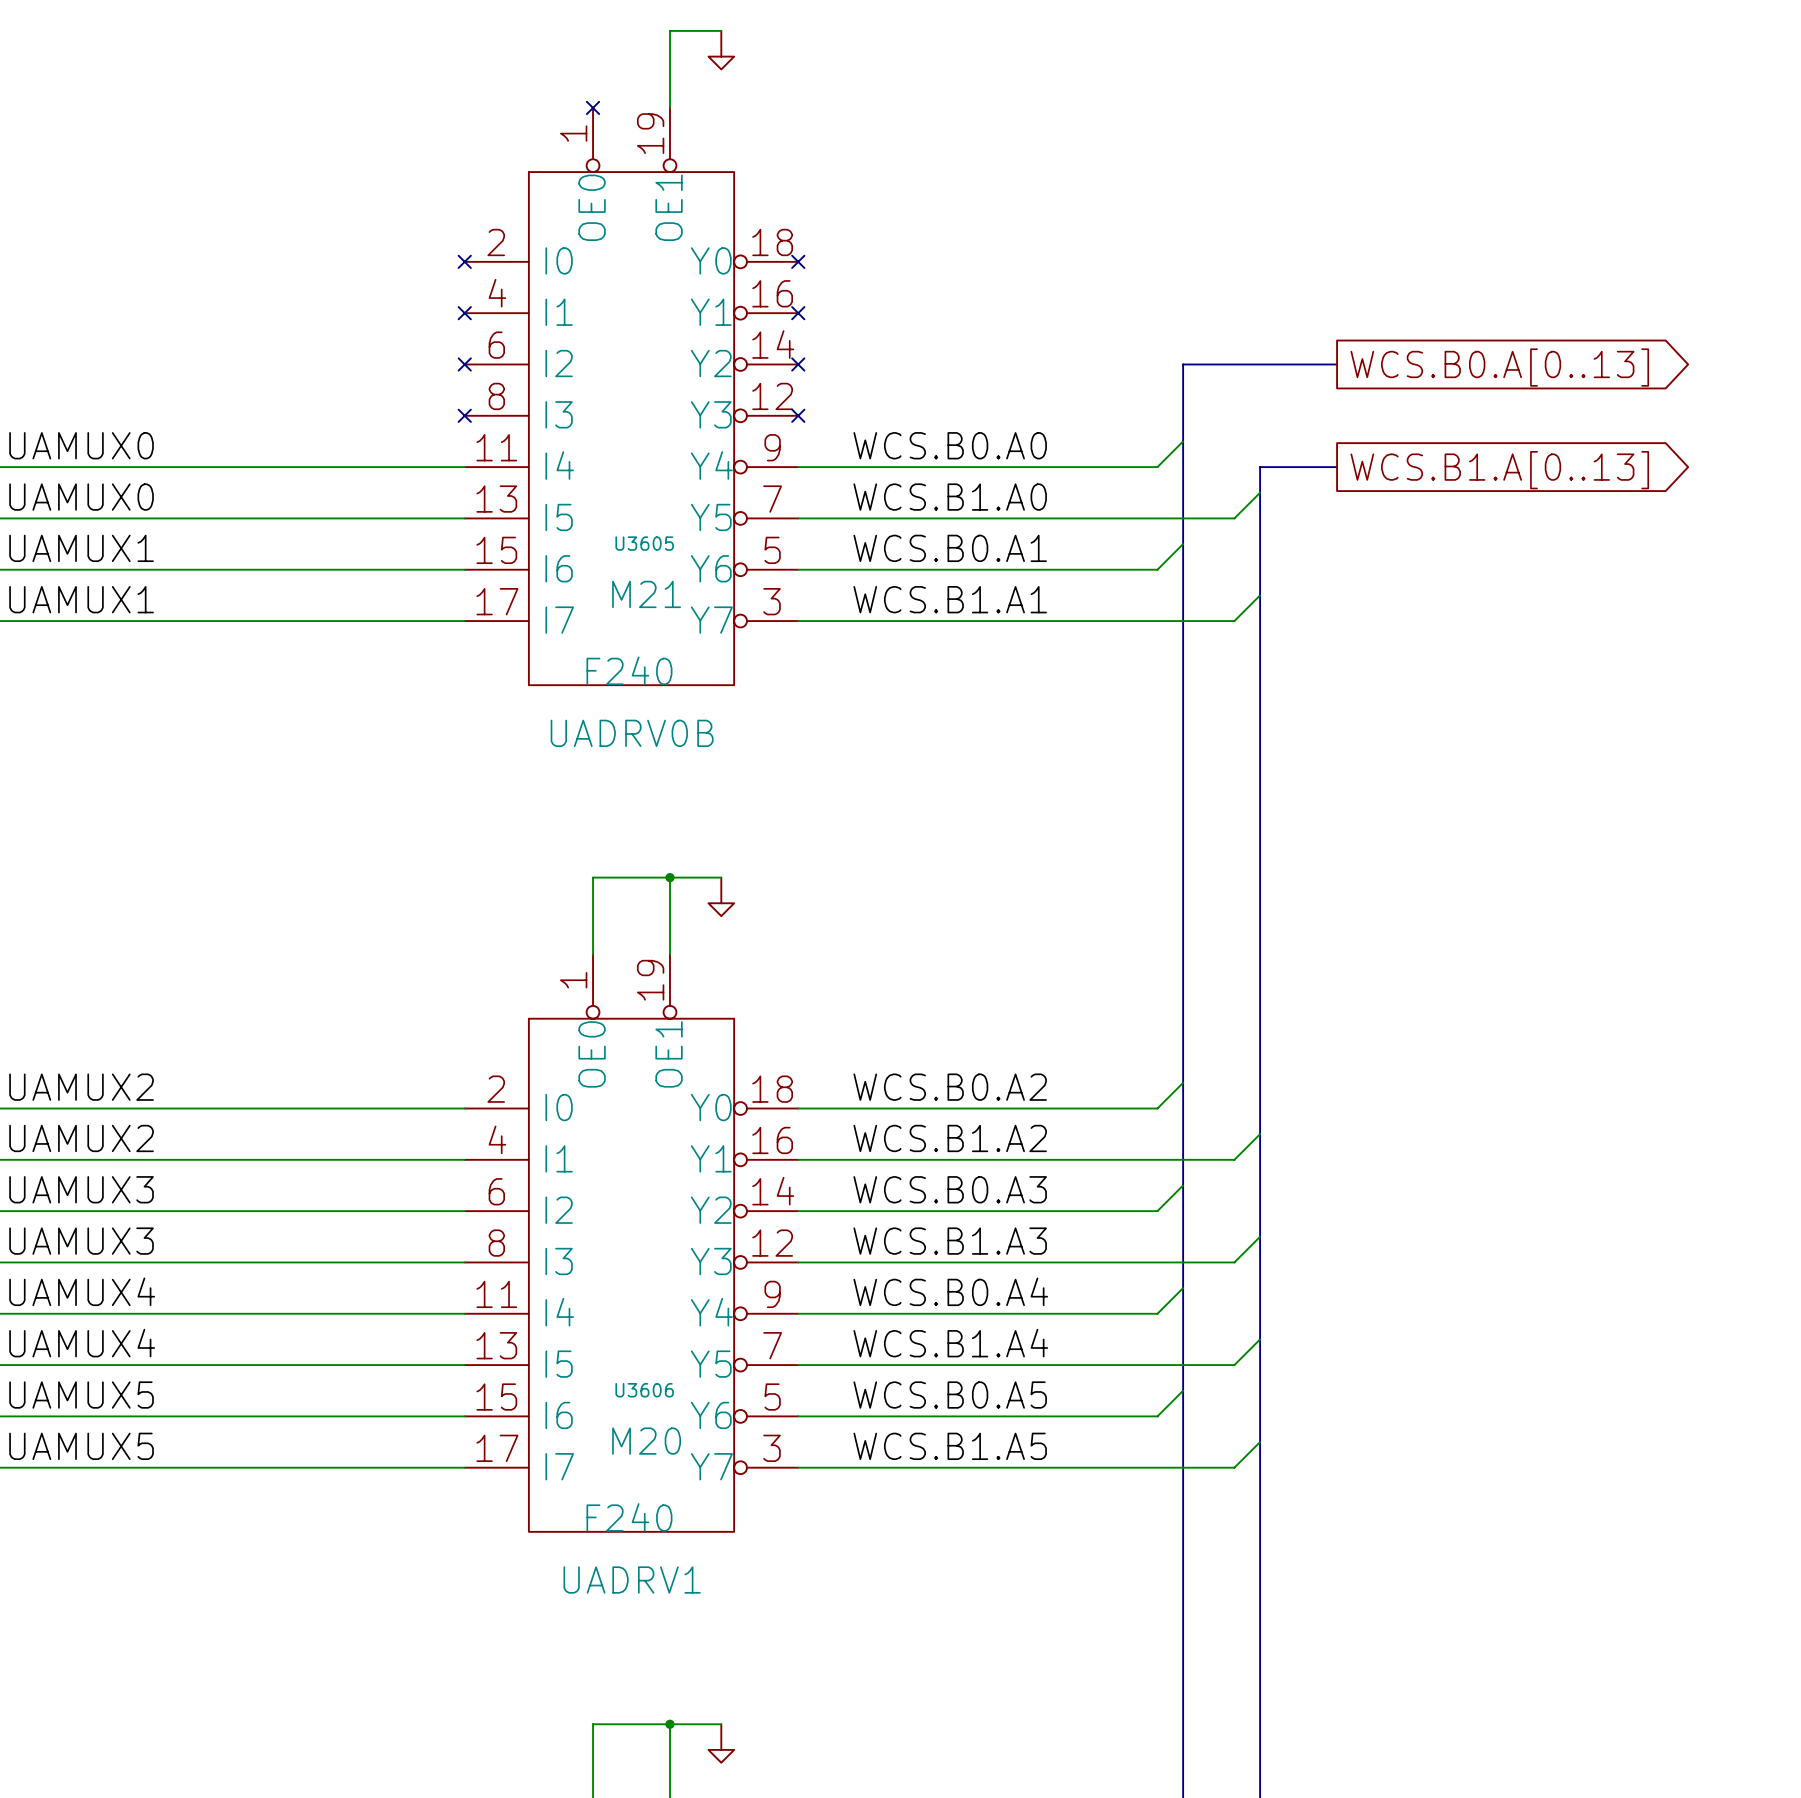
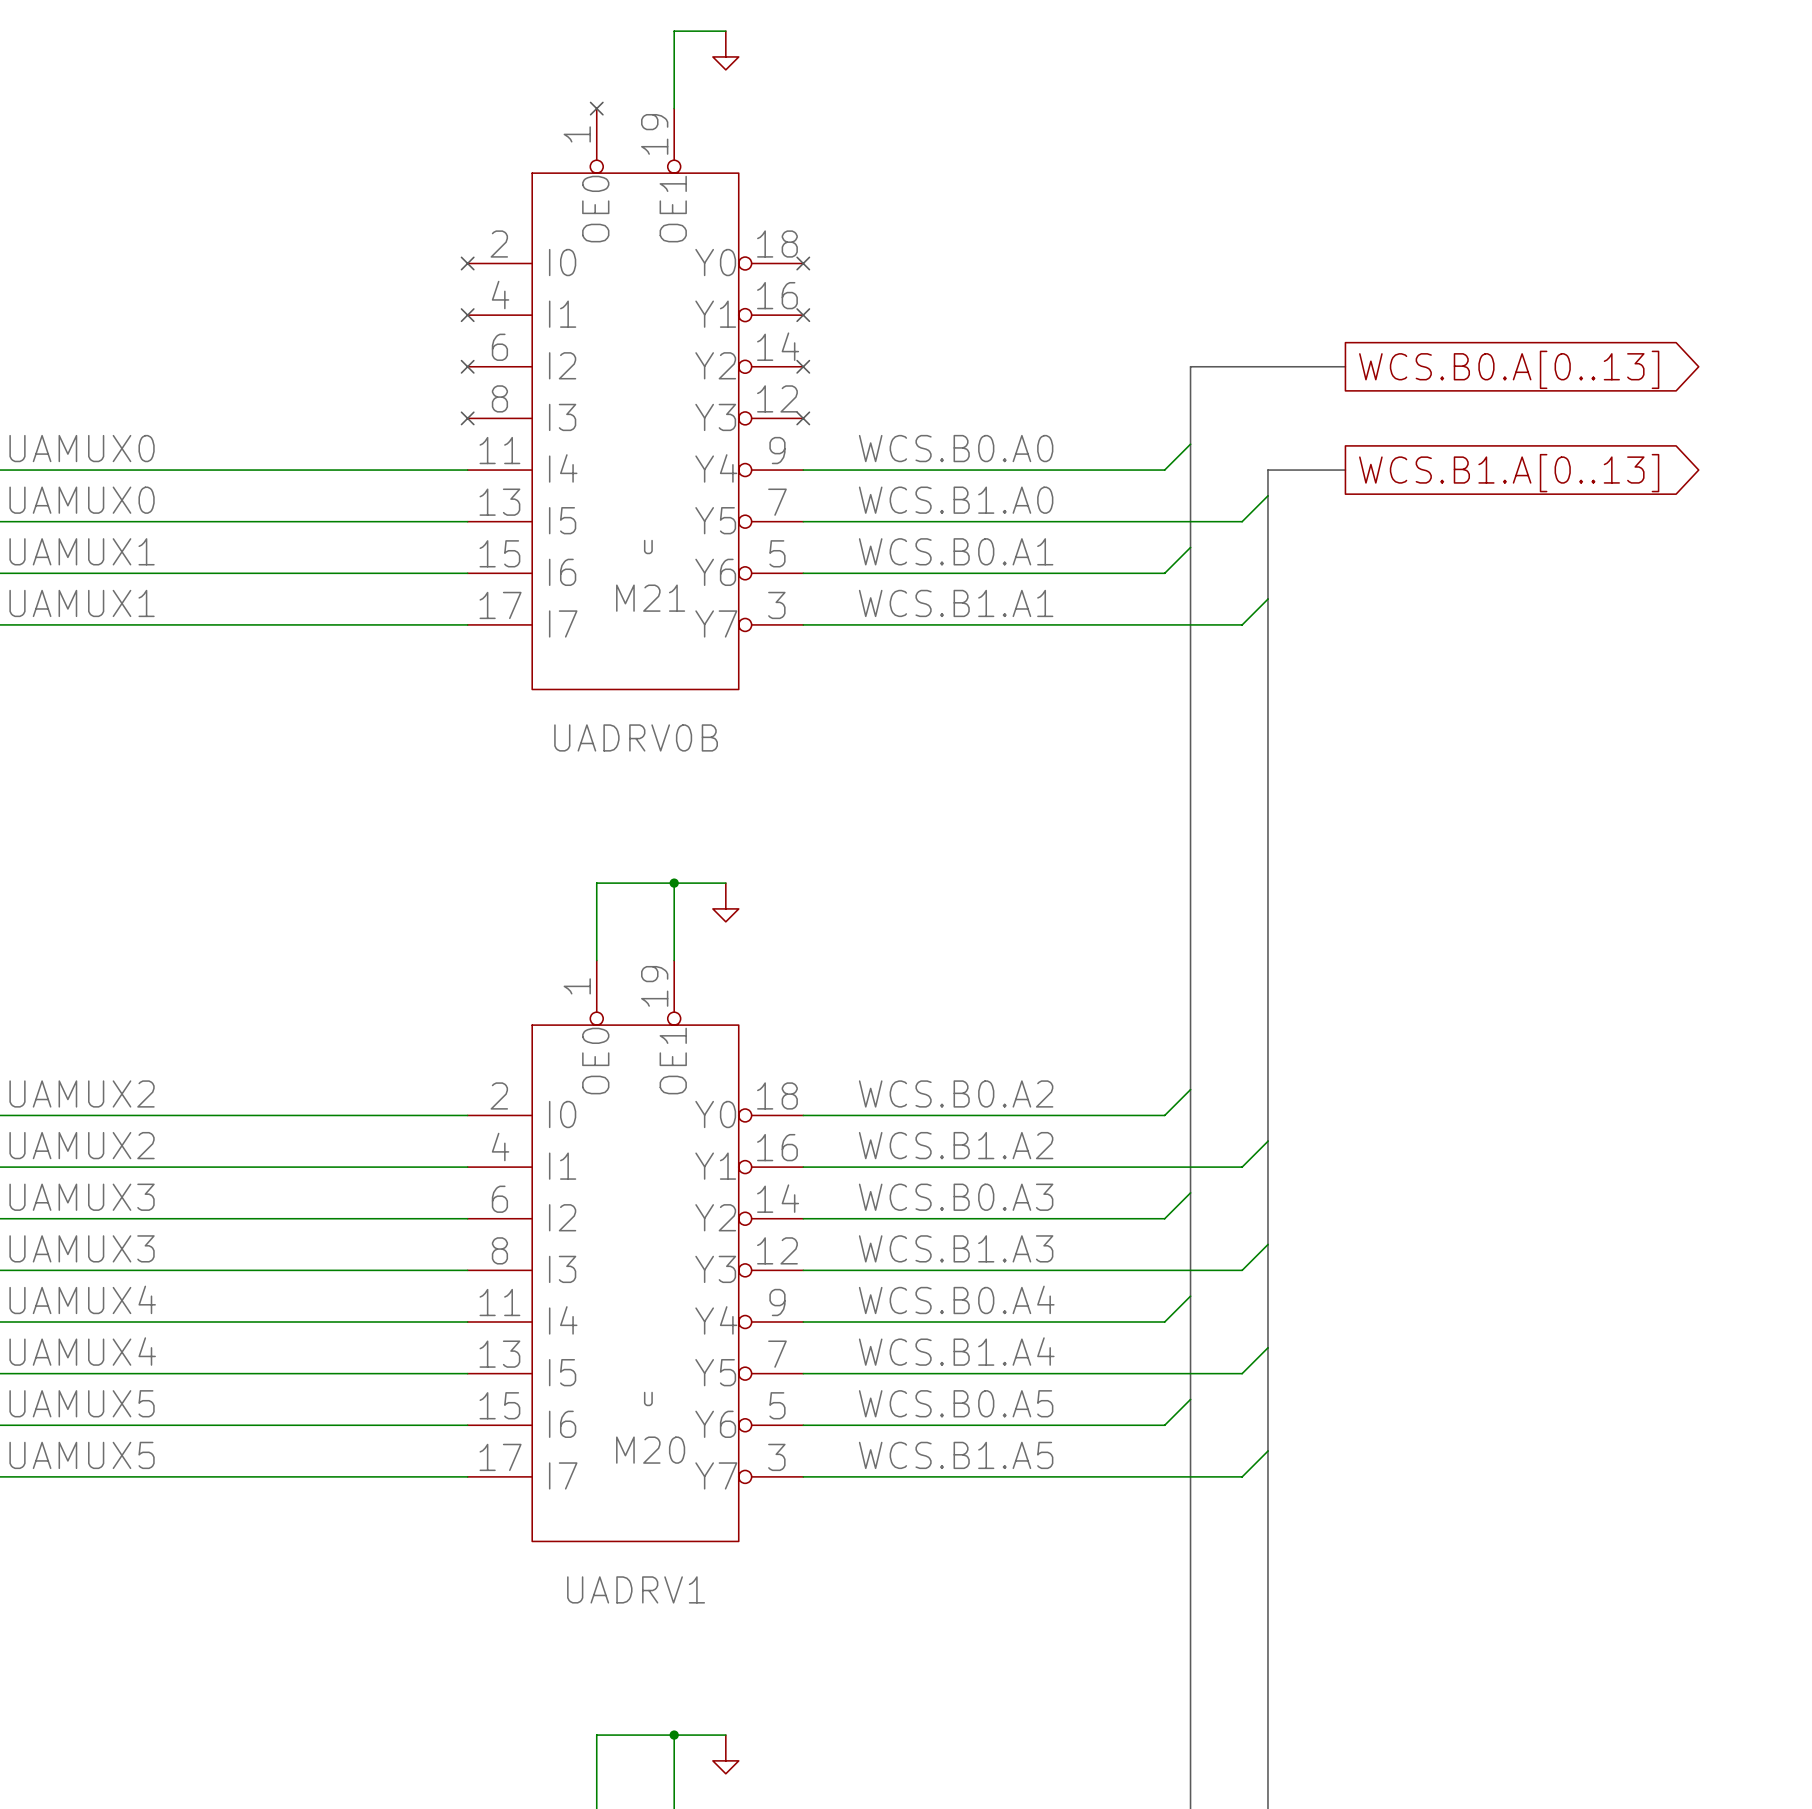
U3605 name: U3605 (644, 543) -> U (648, 547)
U3605 value: F240 (629, 670) -> none
U3606 name: U3606 (644, 1390) -> U (648, 1398)
U3606 value: F240 (629, 1517) -> none

